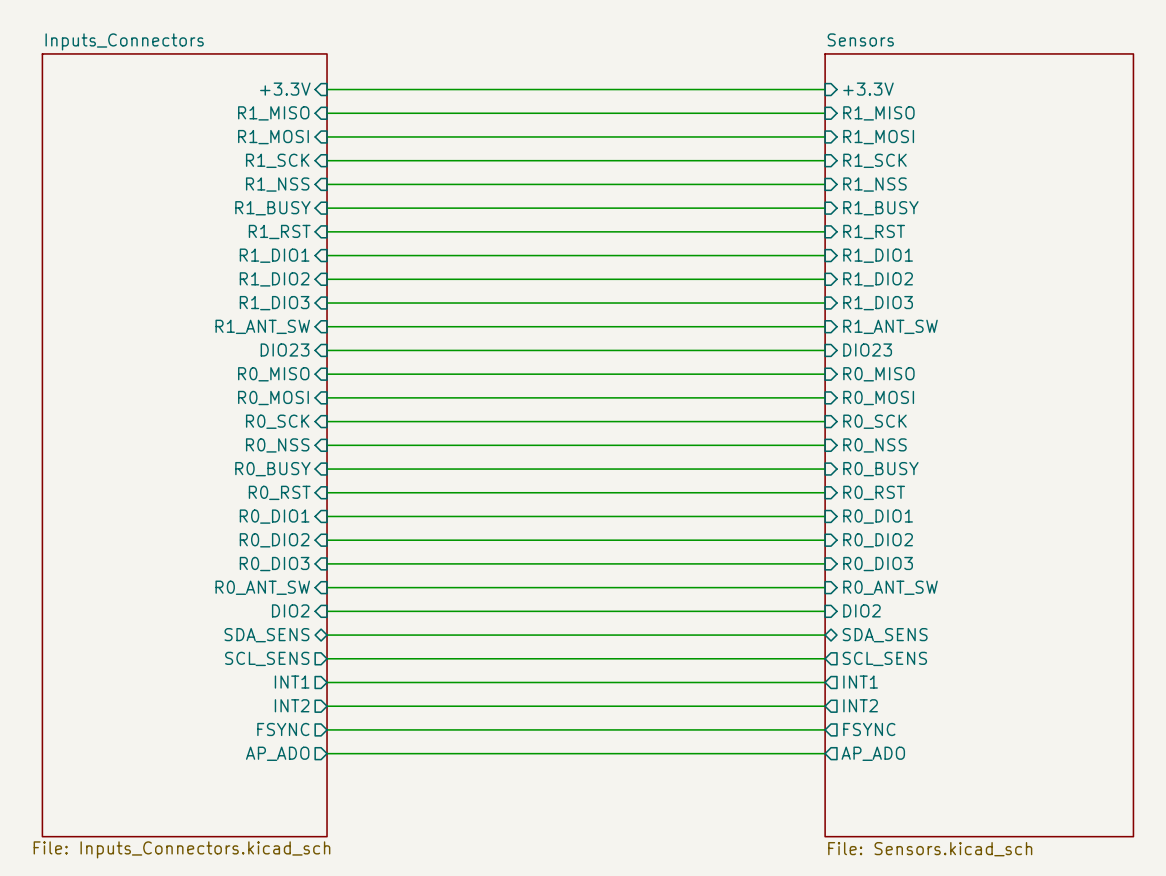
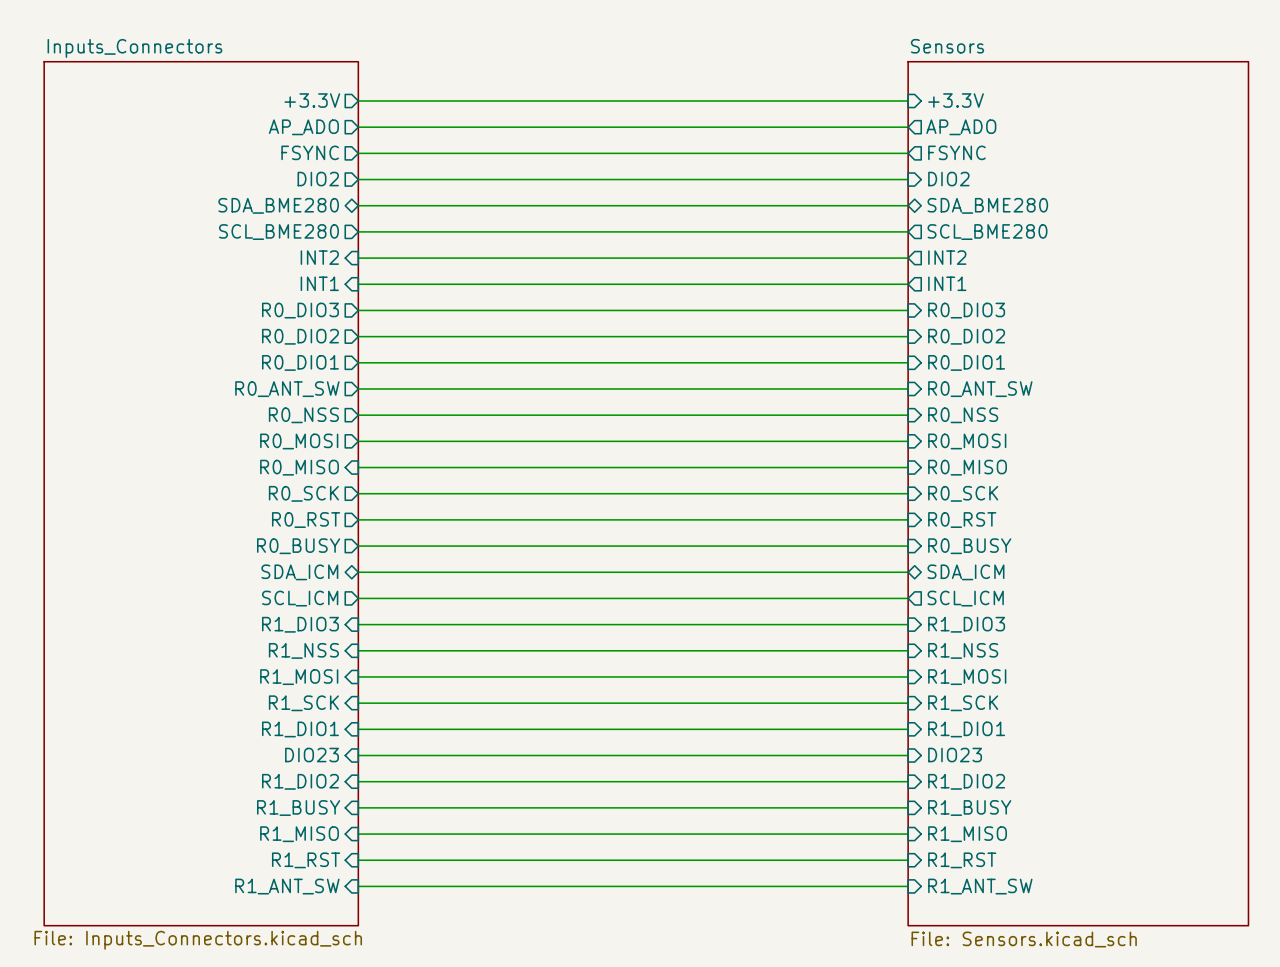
sheet pin shape: input (285, 89) -> output (312, 100)
sheet pin shape: input (273, 113) -> output (303, 127)
sheet pin: R1_MISO (273, 113) -> AP_ADO (303, 127)
sheet pin shape: input (878, 113) -> output (961, 127)
sheet pin: R1_MISO (878, 113) -> AP_ADO (961, 127)
sheet pin shape: input (273, 137) -> output (310, 152)
sheet pin: R1_MOSI (273, 137) -> FSYNC (310, 152)
sheet pin shape: input (878, 137) -> output (956, 152)
sheet pin: R1_MOSI (878, 137) -> FSYNC (956, 152)
sheet pin shape: input (277, 160) -> output (318, 179)
sheet pin: R1_SCK (277, 160) -> DIO2 (318, 179)
sheet pin: R1_SCK (874, 160) -> DIO2 (948, 179)
sheet pin shape: input (277, 184) -> bidirectional (278, 205)
sheet pin: R1_NSS (277, 184) -> SDA_BME280 (278, 205)
sheet pin shape: input (874, 184) -> bidirectional (987, 205)
sheet pin: R1_NSS (874, 184) -> SDA_BME280 (987, 205)
sheet pin shape: input (272, 208) -> output (278, 232)
sheet pin: R1_BUSY (272, 208) -> SCL_BME280 (278, 232)
sheet pin shape: input (880, 208) -> output (987, 232)
sheet pin: R1_BUSY (880, 208) -> SCL_BME280 (987, 232)
sheet pin: R1_RST (279, 231) -> INT2 (319, 257)
sheet pin shape: input (874, 231) -> output (947, 257)
sheet pin: R1_RST (874, 231) -> INT2 (947, 257)
sheet pin: R1_DIO1 (274, 255) -> INT1 (319, 283)
sheet pin shape: input (878, 255) -> output (947, 283)
sheet pin: R1_DIO1 (878, 255) -> INT1 (947, 283)
sheet pin shape: input (274, 279) -> output (300, 310)
sheet pin: R1_DIO2 (274, 279) -> R0_DIO3 (300, 310)
sheet pin: R1_DIO2 (878, 279) -> R0_DIO3 (966, 310)
sheet pin shape: input (274, 303) -> output (300, 336)
sheet pin: R1_DIO3 (274, 303) -> R0_DIO2 (300, 336)
sheet pin: R1_DIO3 (878, 303) -> R0_DIO2 (966, 336)
sheet pin shape: input (262, 326) -> output (300, 362)
sheet pin: R1_ANT_SW (262, 326) -> R0_DIO1 (300, 362)
sheet pin: R1_ANT_SW (890, 326) -> R0_DIO1 (966, 362)
sheet pin shape: input (285, 350) -> output (287, 389)
sheet pin: DIO23 (285, 350) -> R0_ANT_SW (287, 389)
sheet pin: DIO23 (867, 350) -> R0_ANT_SW (980, 389)
sheet pin shape: input (273, 374) -> output (303, 415)
sheet pin: R0_MISO (273, 374) -> R0_NSS (303, 415)
sheet pin: R0_MISO (878, 374) -> R0_NSS (963, 415)
sheet pin shape: input (273, 398) -> output (299, 441)
sheet pin: R0_SCK (277, 421) -> R0_MISO (299, 467)
sheet pin: R0_SCK (874, 421) -> R0_MISO (967, 467)
sheet pin shape: input (277, 445) -> output (303, 493)
sheet pin: R0_NSS (277, 445) -> R0_SCK (303, 493)
sheet pin: R0_NSS (874, 445) -> R0_SCK (963, 493)
sheet pin shape: input (272, 469) -> output (306, 520)
sheet pin: R0_BUSY (272, 469) -> R0_RST (306, 520)
sheet pin: R0_BUSY (880, 469) -> R0_RST (962, 520)
sheet pin shape: input (279, 492) -> output (298, 546)
sheet pin: R0_RST (279, 492) -> R0_BUSY (298, 546)
sheet pin: R0_RST (874, 492) -> R0_BUSY (969, 546)
sheet pin shape: input (274, 516) -> bidirectional (299, 572)
sheet pin: R0_DIO1 (274, 516) -> SDA_ICM (299, 572)
sheet pin shape: input (878, 516) -> bidirectional (965, 572)
sheet pin: R0_DIO1 (878, 516) -> SDA_ICM (965, 572)
sheet pin shape: input (274, 540) -> output (300, 598)
sheet pin: R0_DIO2 (274, 540) -> SCL_ICM (300, 598)
sheet pin shape: input (878, 540) -> output (965, 598)
sheet pin: R0_DIO2 (878, 540) -> SCL_ICM (965, 598)
sheet pin: R0_DIO3 (274, 564) -> R1_DIO3 (300, 624)
sheet pin: R0_DIO3 (878, 564) -> R1_DIO3 (966, 624)
sheet pin: R0_ANT_SW (262, 587) -> R1_NSS (303, 650)
sheet pin: R0_ANT_SW (890, 587) -> R1_NSS (963, 650)
sheet pin: DIO2 (290, 610) -> R1_MOSI (299, 677)
sheet pin: DIO2 (862, 610) -> R1_MOSI (967, 677)
sheet pin shape: bidirectional (266, 635) -> input (303, 703)
sheet pin: SDA_SENS (266, 635) -> R1_SCK (303, 703)
sheet pin shape: bidirectional (885, 635) -> input (963, 703)
sheet pin: SDA_SENS (885, 635) -> R1_SCK (963, 703)
sheet pin shape: output (267, 658) -> input (300, 729)
sheet pin: SCL_SENS (267, 658) -> R1_DIO1 (300, 729)
sheet pin shape: output (884, 658) -> input (966, 729)
sheet pin: SCL_SENS (884, 658) -> R1_DIO1 (966, 729)
sheet pin shape: output (292, 682) -> input (312, 755)
sheet pin: INT1 (292, 682) -> DIO23 (312, 755)
sheet pin shape: output (860, 682) -> input (955, 755)
sheet pin: INT1 (860, 682) -> DIO23 (955, 755)
sheet pin shape: output (292, 705) -> input (300, 781)
sheet pin: INT2 (292, 705) -> R1_DIO2 (300, 781)
sheet pin shape: output (860, 705) -> input (966, 781)
sheet pin: INT2 (860, 705) -> R1_DIO2 (966, 781)
sheet pin shape: output (283, 729) -> input (298, 808)
sheet pin: FSYNC (283, 729) -> R1_BUSY (298, 808)
sheet pin shape: output (869, 729) -> input (969, 808)
sheet pin: FSYNC (869, 729) -> R1_BUSY (969, 808)
sheet pin shape: output (277, 753) -> input (299, 834)
sheet pin: AP_ADO (277, 753) -> R1_MISO (299, 834)
sheet pin shape: output (873, 753) -> input (967, 834)
sheet pin: AP_ADO (873, 753) -> R1_MISO (967, 834)
sheet pin: none -> R1_RST (306, 860)
wire: none -> (358, 860) (908, 860)
sheet pin: none -> R1_RST (962, 860)
sheet pin: none -> R1_ANT_SW (287, 886)
wire: none -> (358, 886) (908, 886)
sheet pin: none -> R1_ANT_SW (980, 886)

